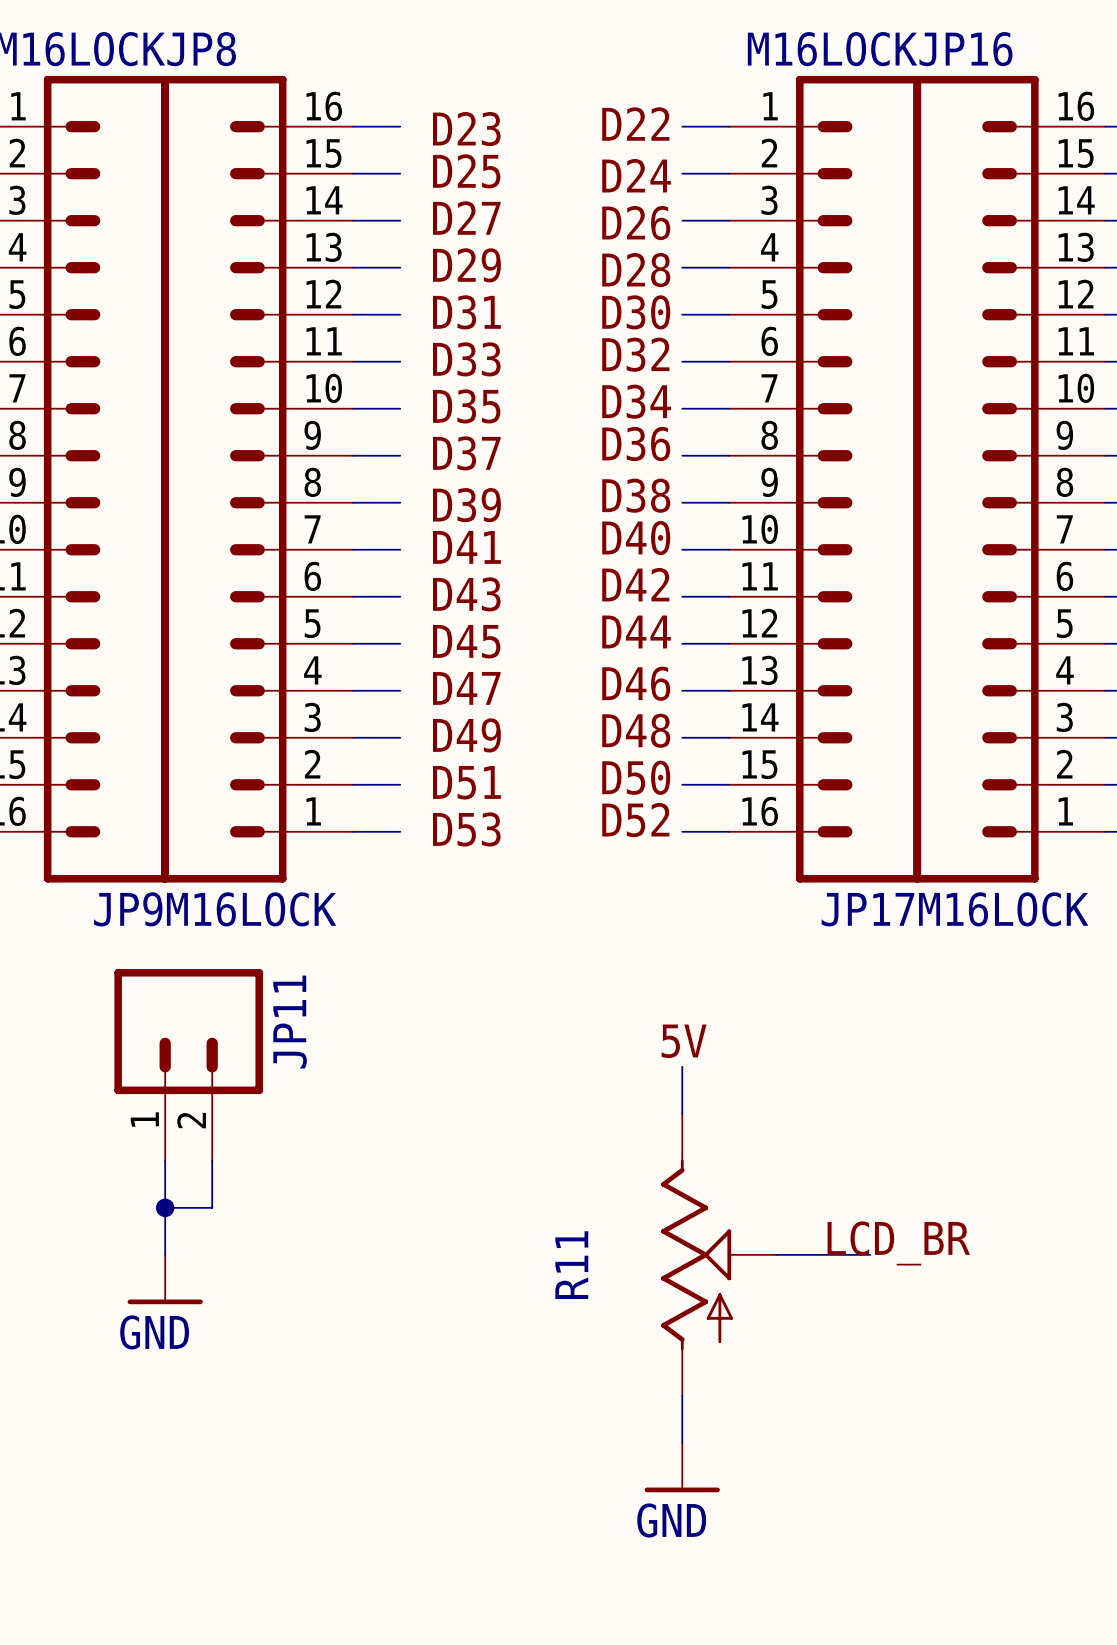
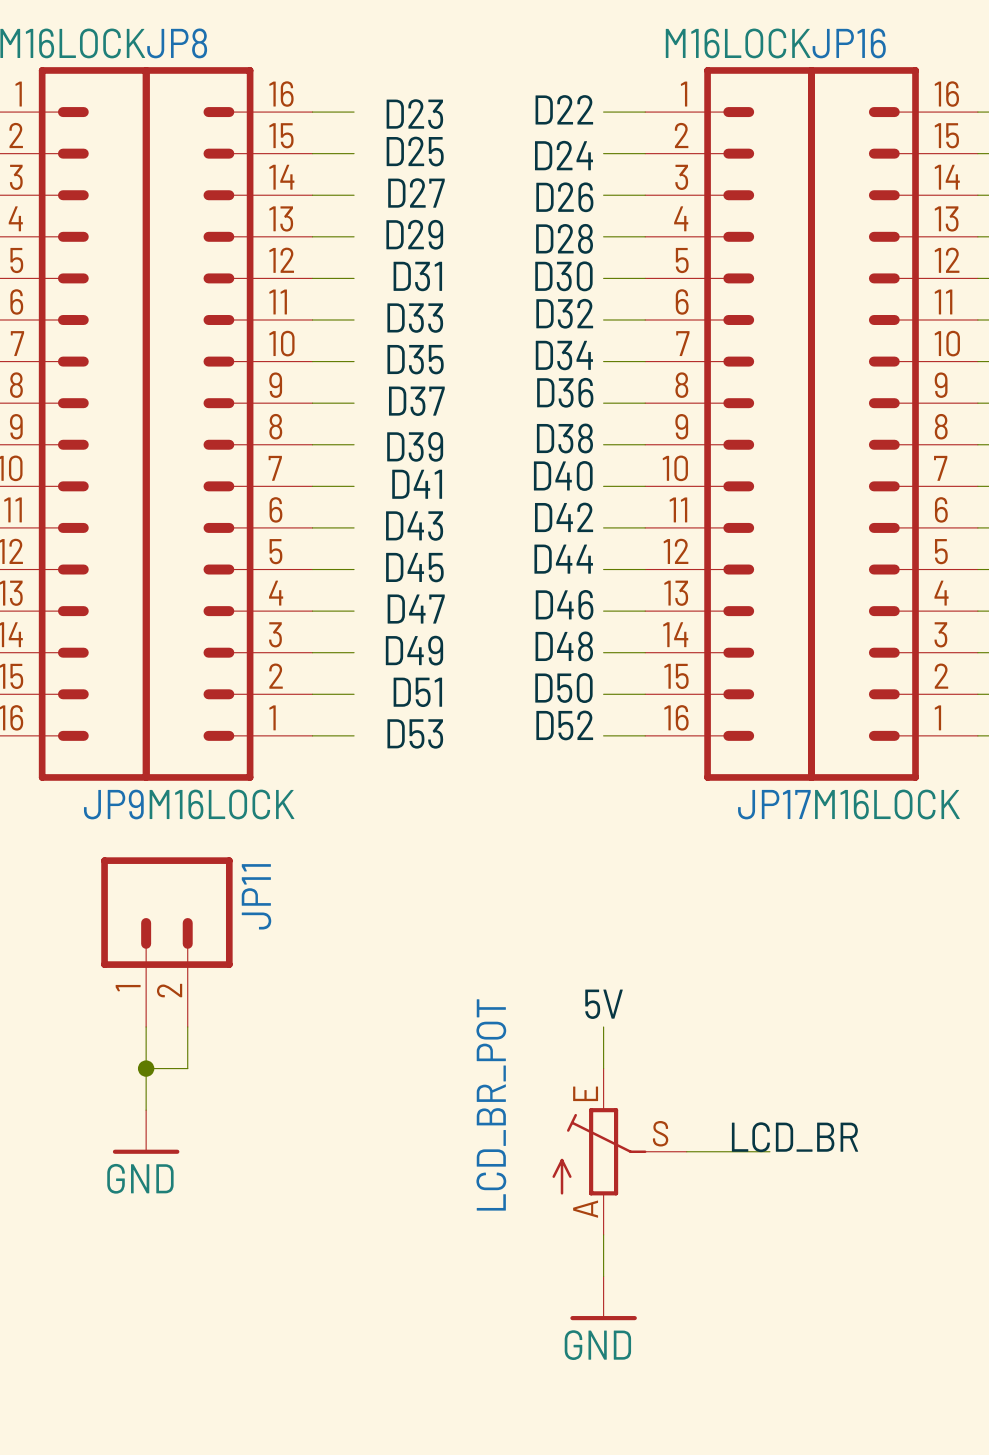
label position: 5V (684, 1041) -> 5V (604, 1004)
wire: (682, 1066) (682, 1113) -> (603, 1026) (603, 1068)
label position: LCD_BR (898, 1243) -> LCD_BR (795, 1137)
R11: (718, 1254) -> none
wire: (776, 1254) (870, 1254) -> (686, 1151) (769, 1151)
LCD_BR_POT: none -> (619, 1151)

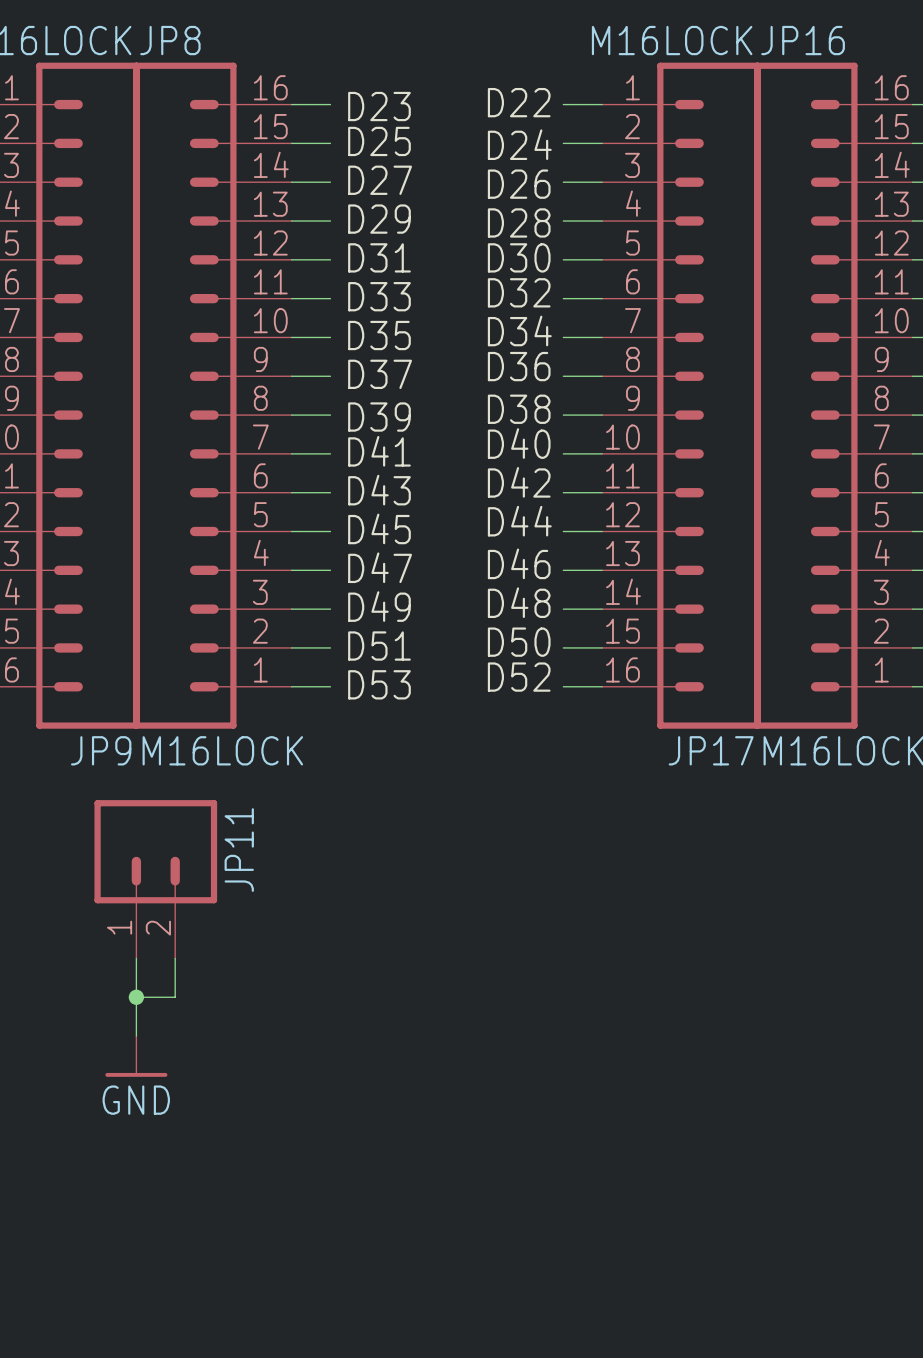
label: 5V (604, 1004) -> none
wire: (603, 1026) (603, 1068) -> none
label: LCD_BR (795, 1137) -> none
LCD_BR_POT: (619, 1151) -> none
wire: (686, 1151) (769, 1151) -> none
wire: (603, 1234) (603, 1276) -> none
power symbol: GND (603, 1298) -> none

